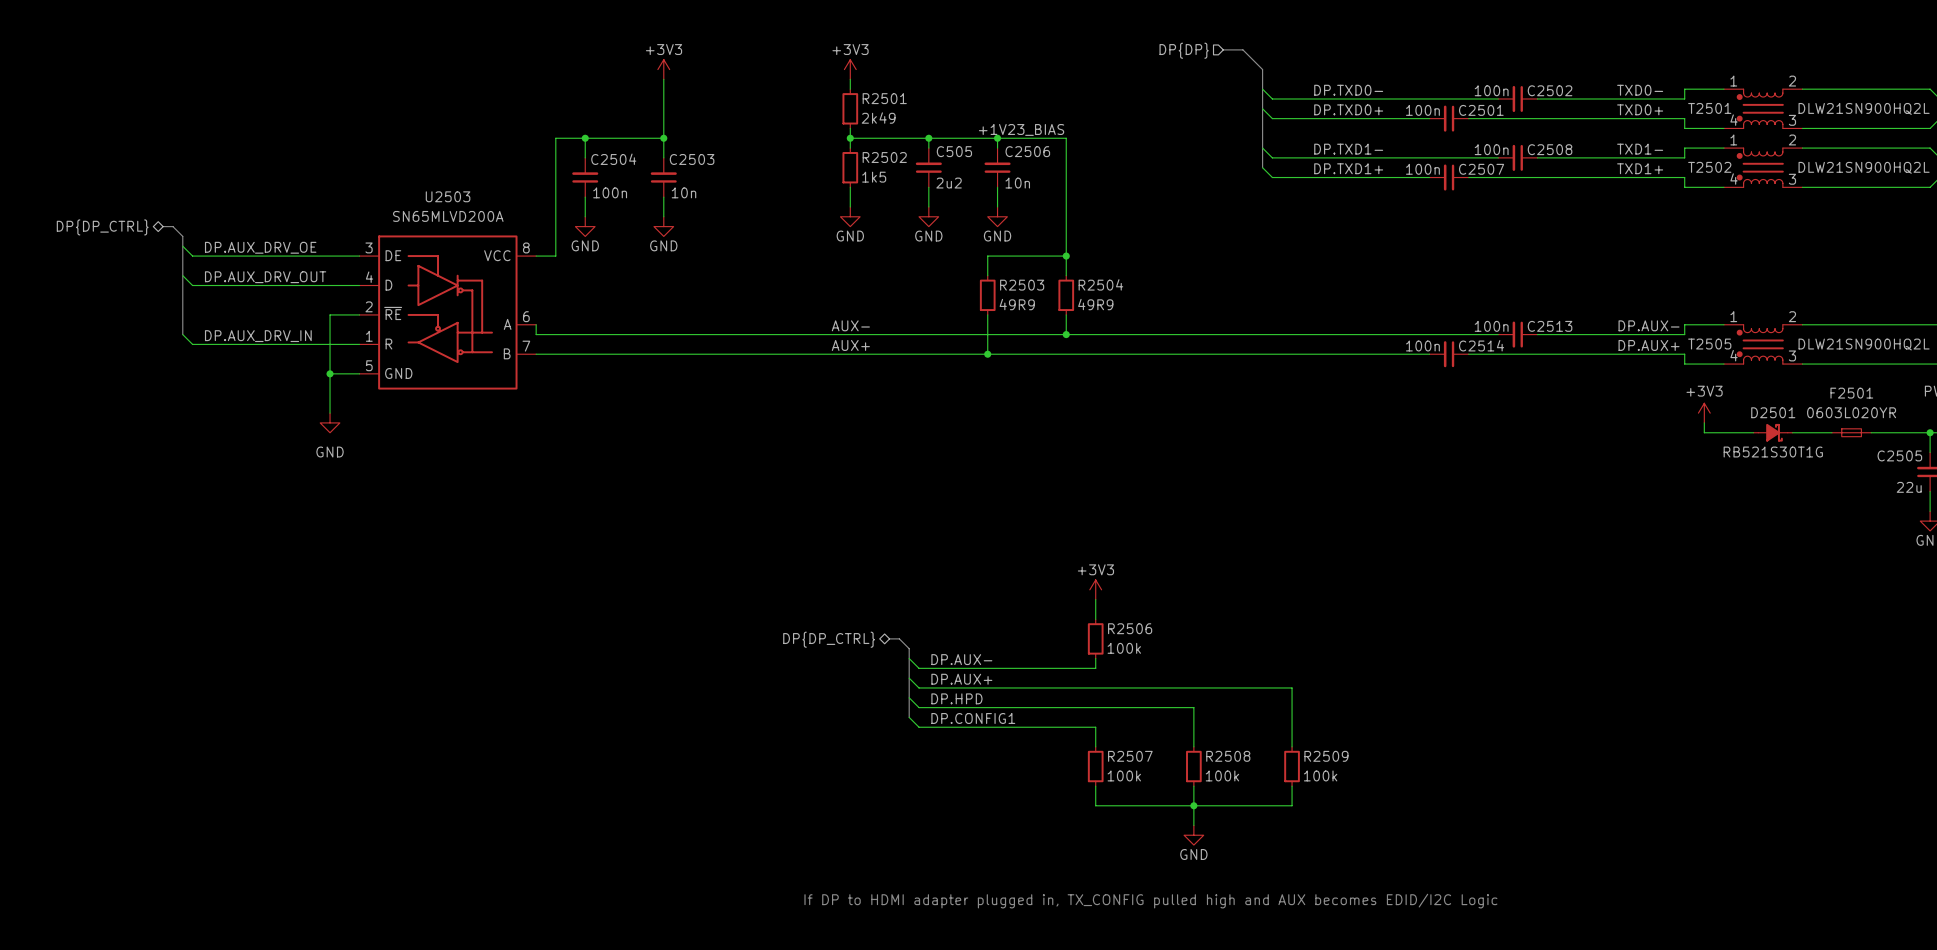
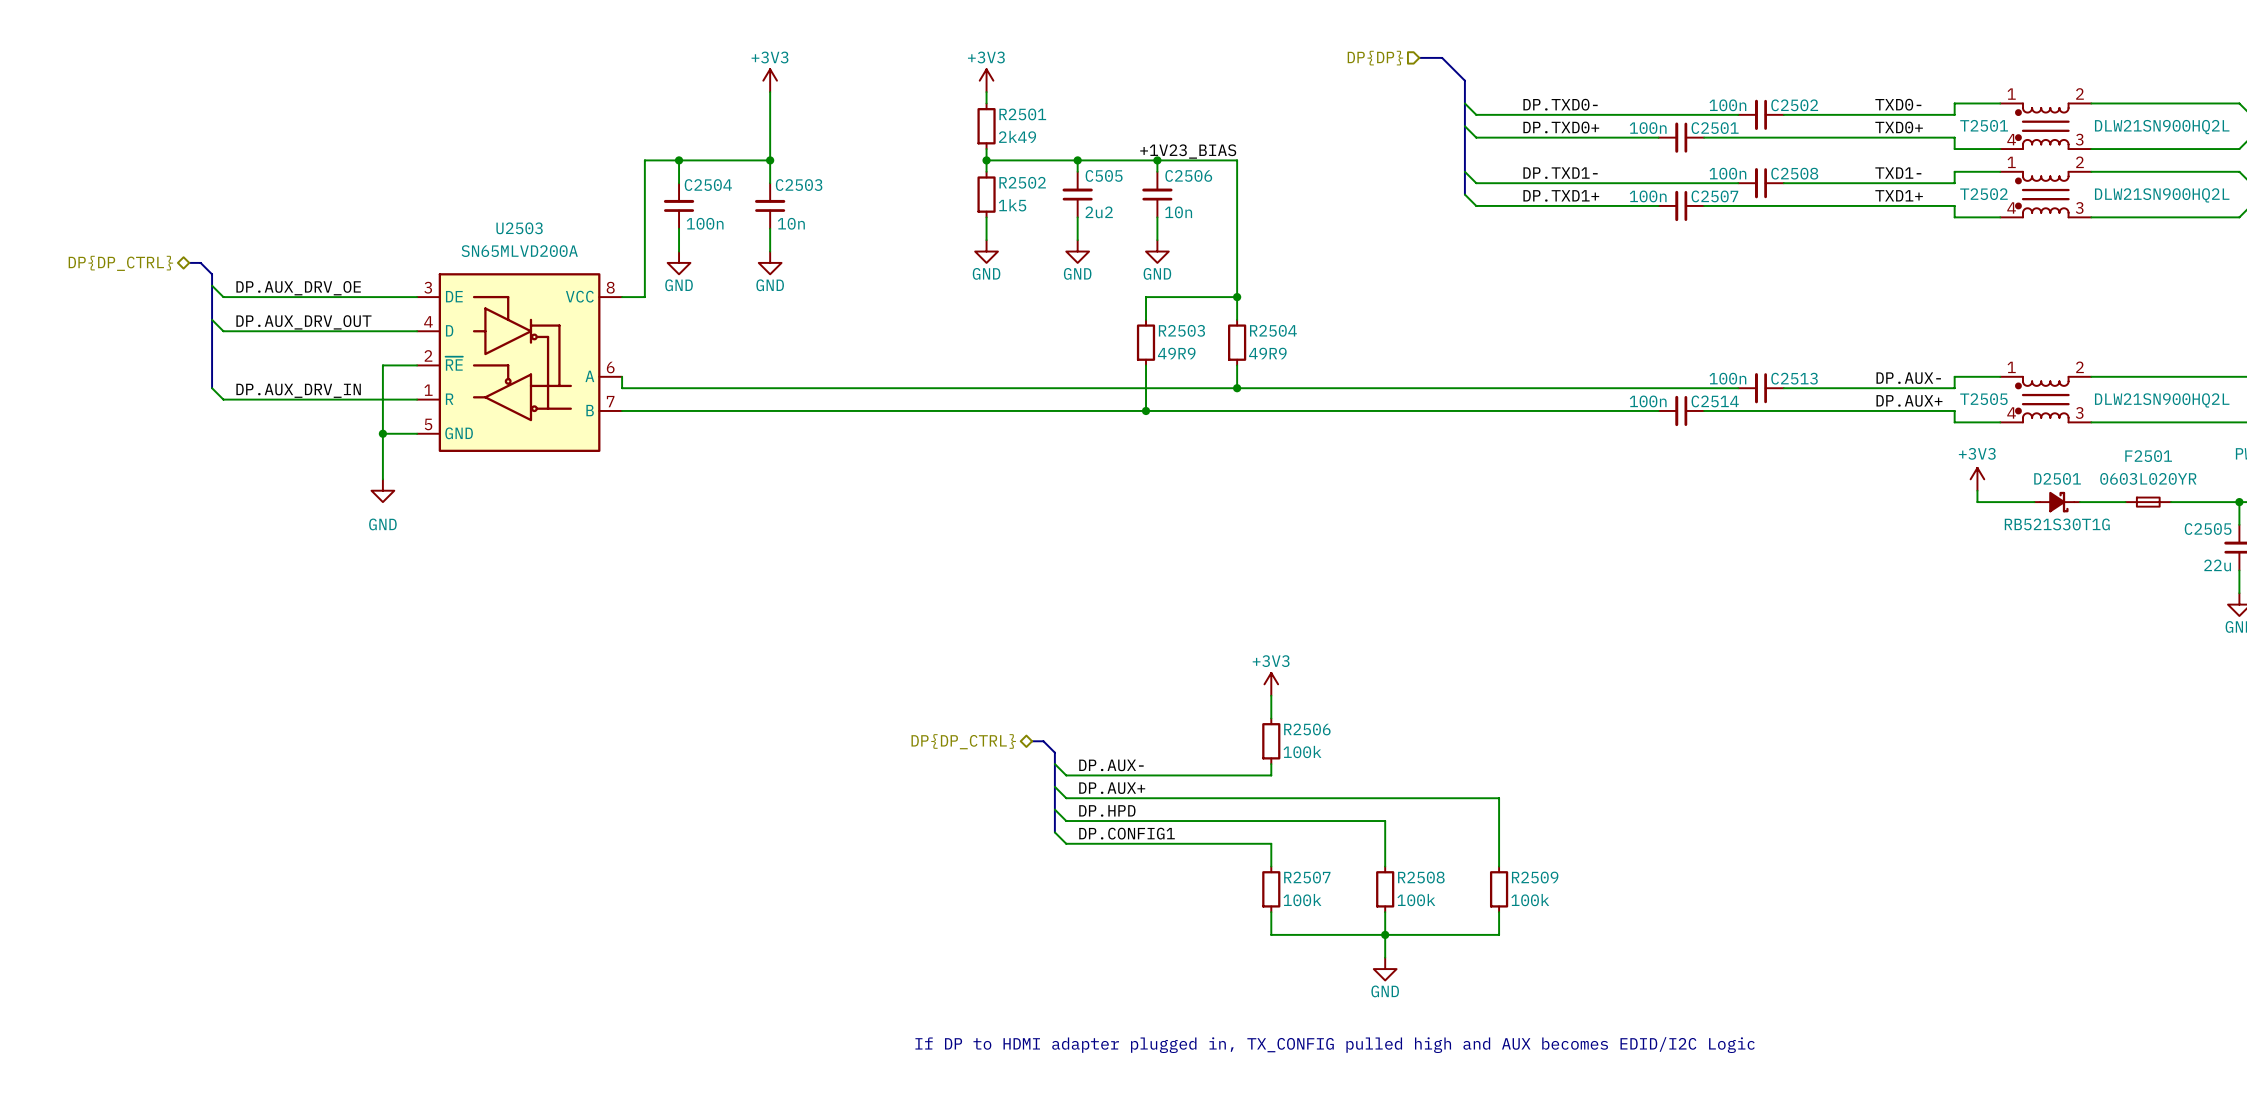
label: AUX- (850, 325) -> none
label: AUX+ (850, 345) -> none

